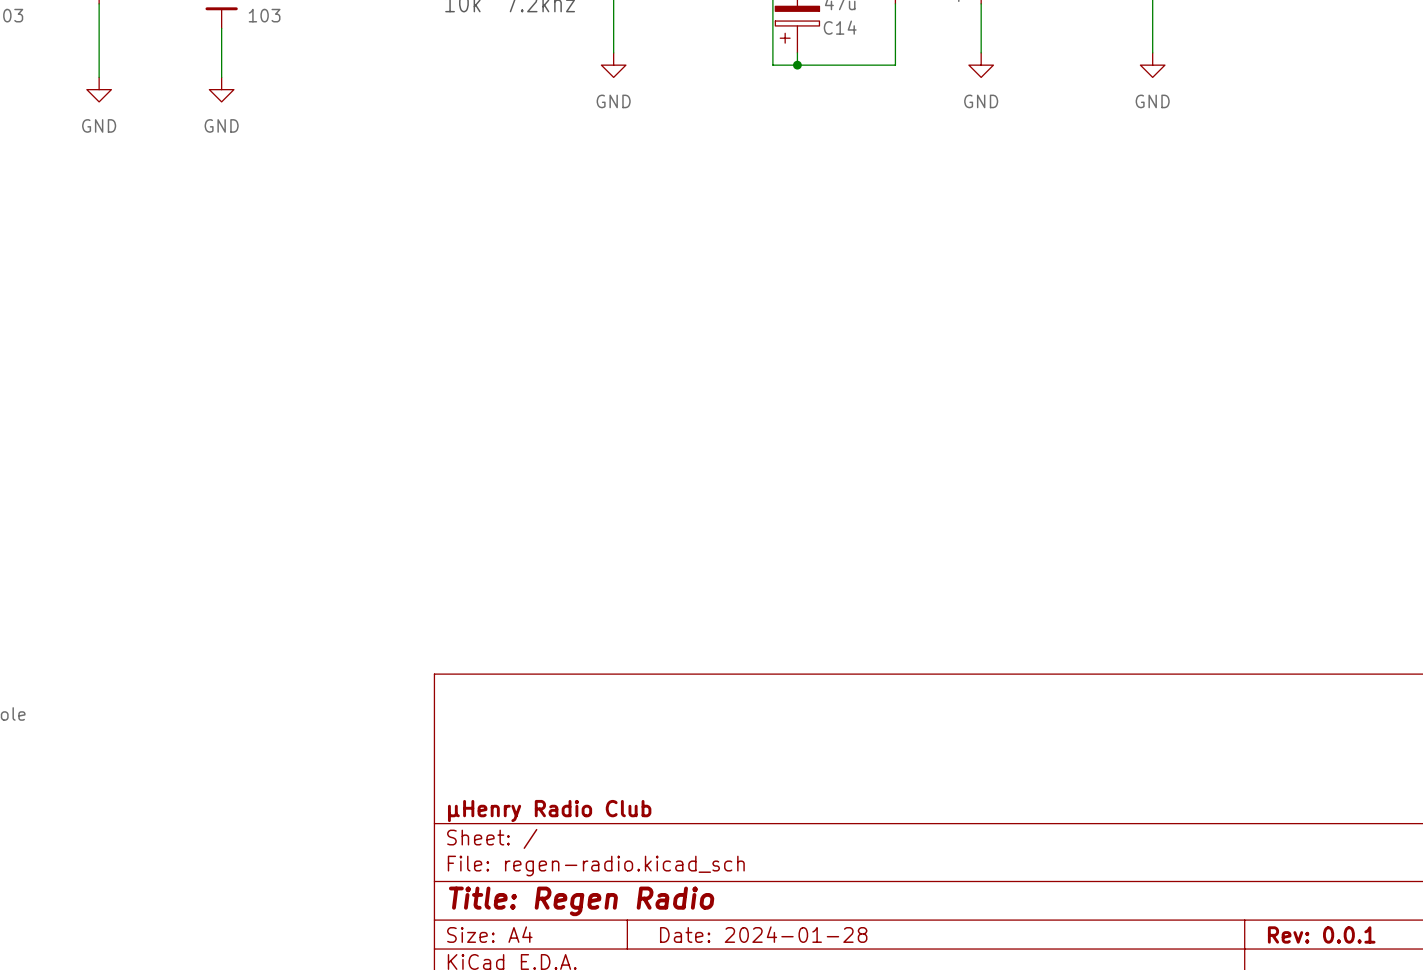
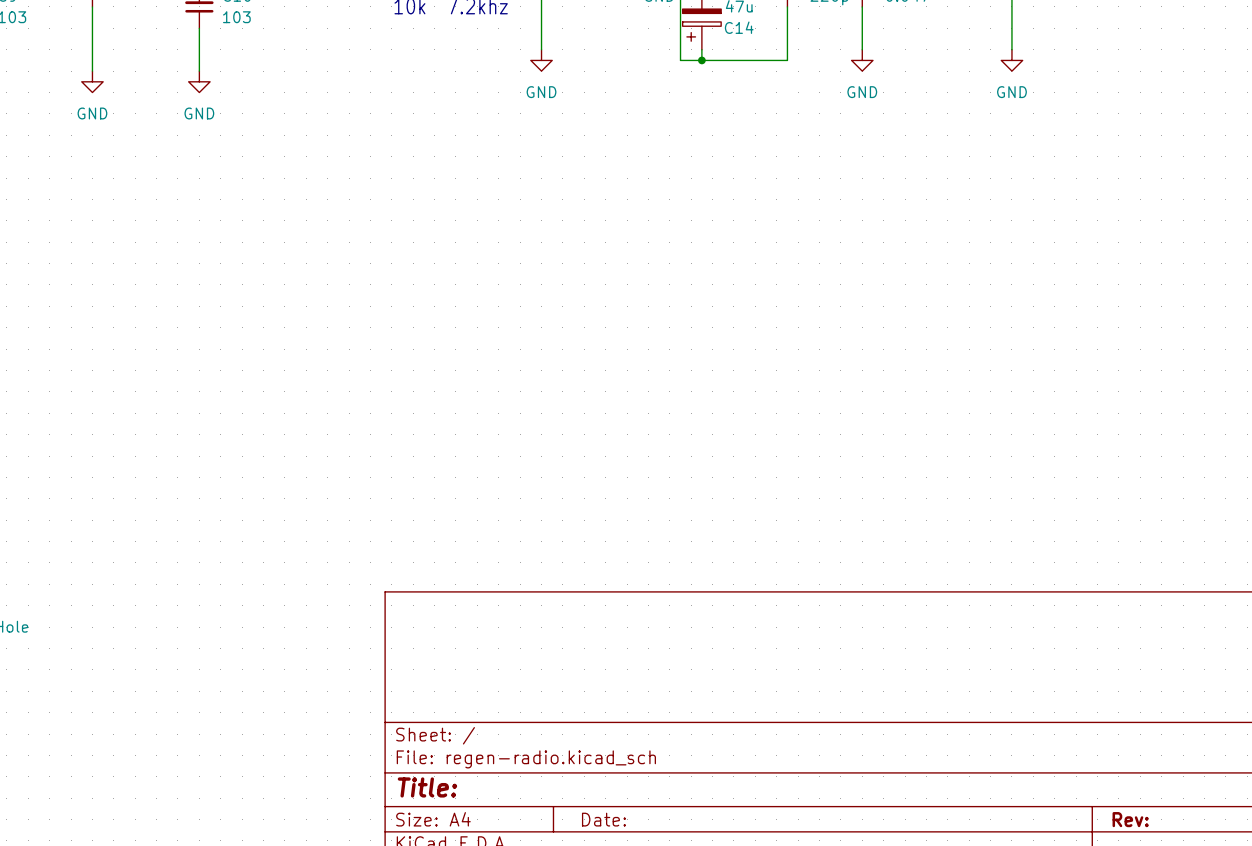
title block: µHenry Radio Club (549, 811) -> none
title block: Title: Regen Radio (581, 901) -> Title: (427, 787)
title block: Date: 2024-01-28 (763, 934) -> Date: (603, 819)
title block: Rev: 0.0.1 (1321, 934) -> Rev: (1130, 819)

